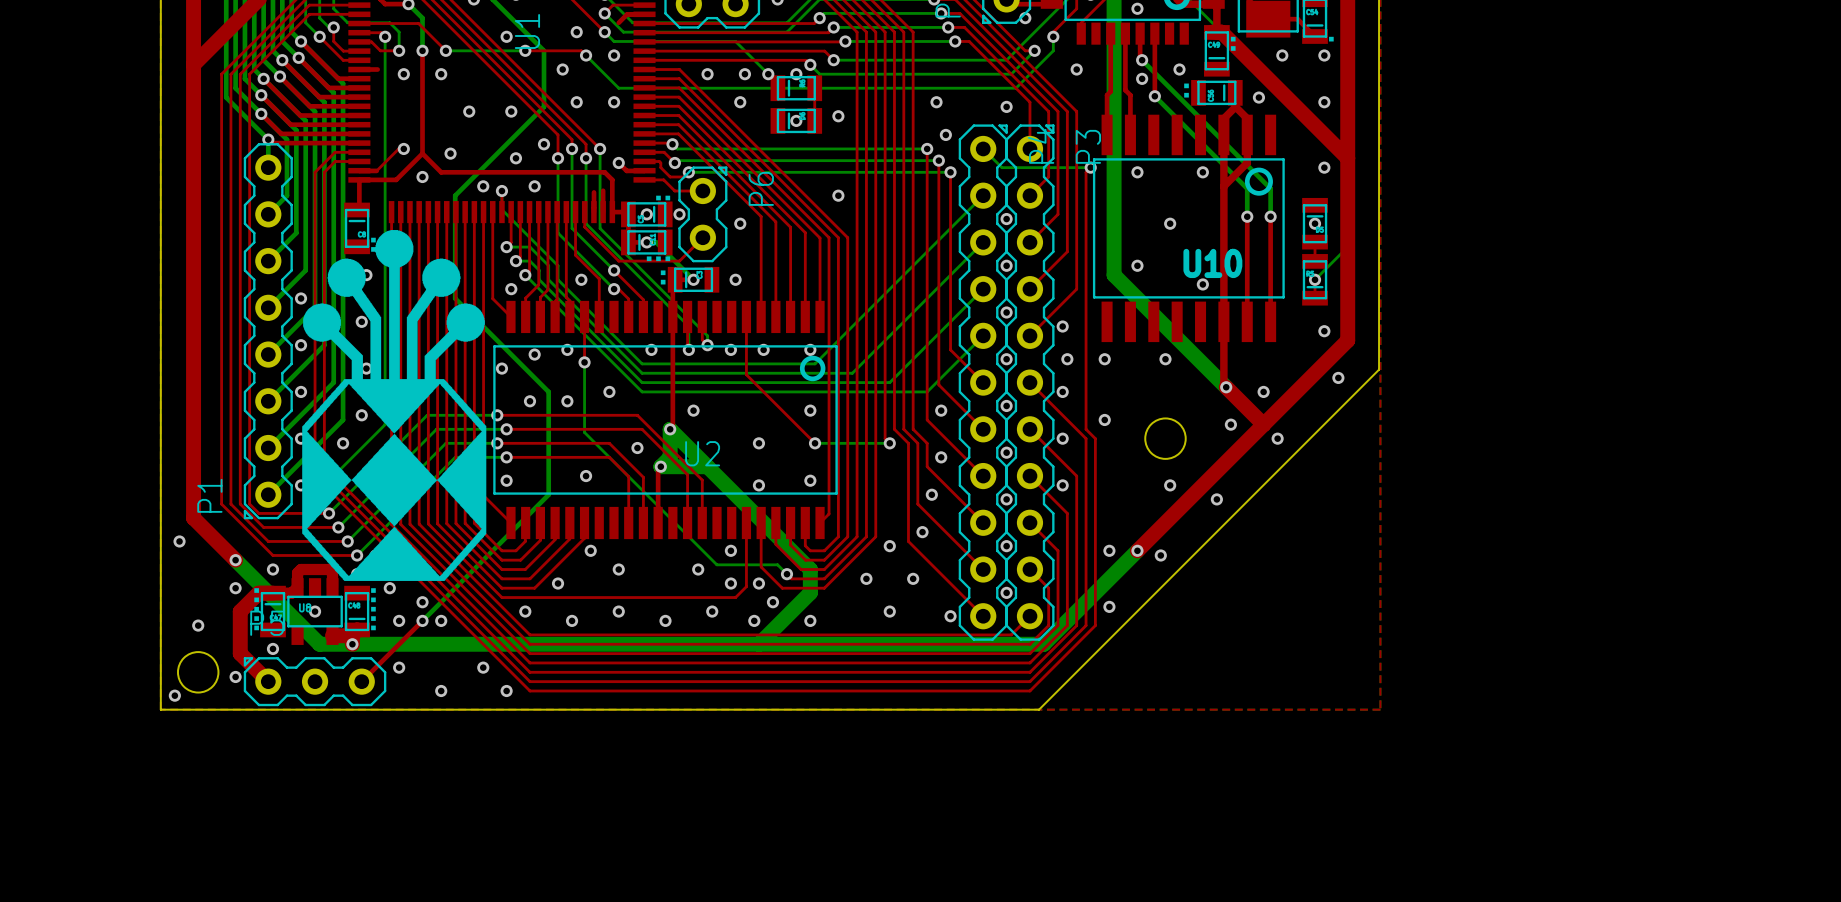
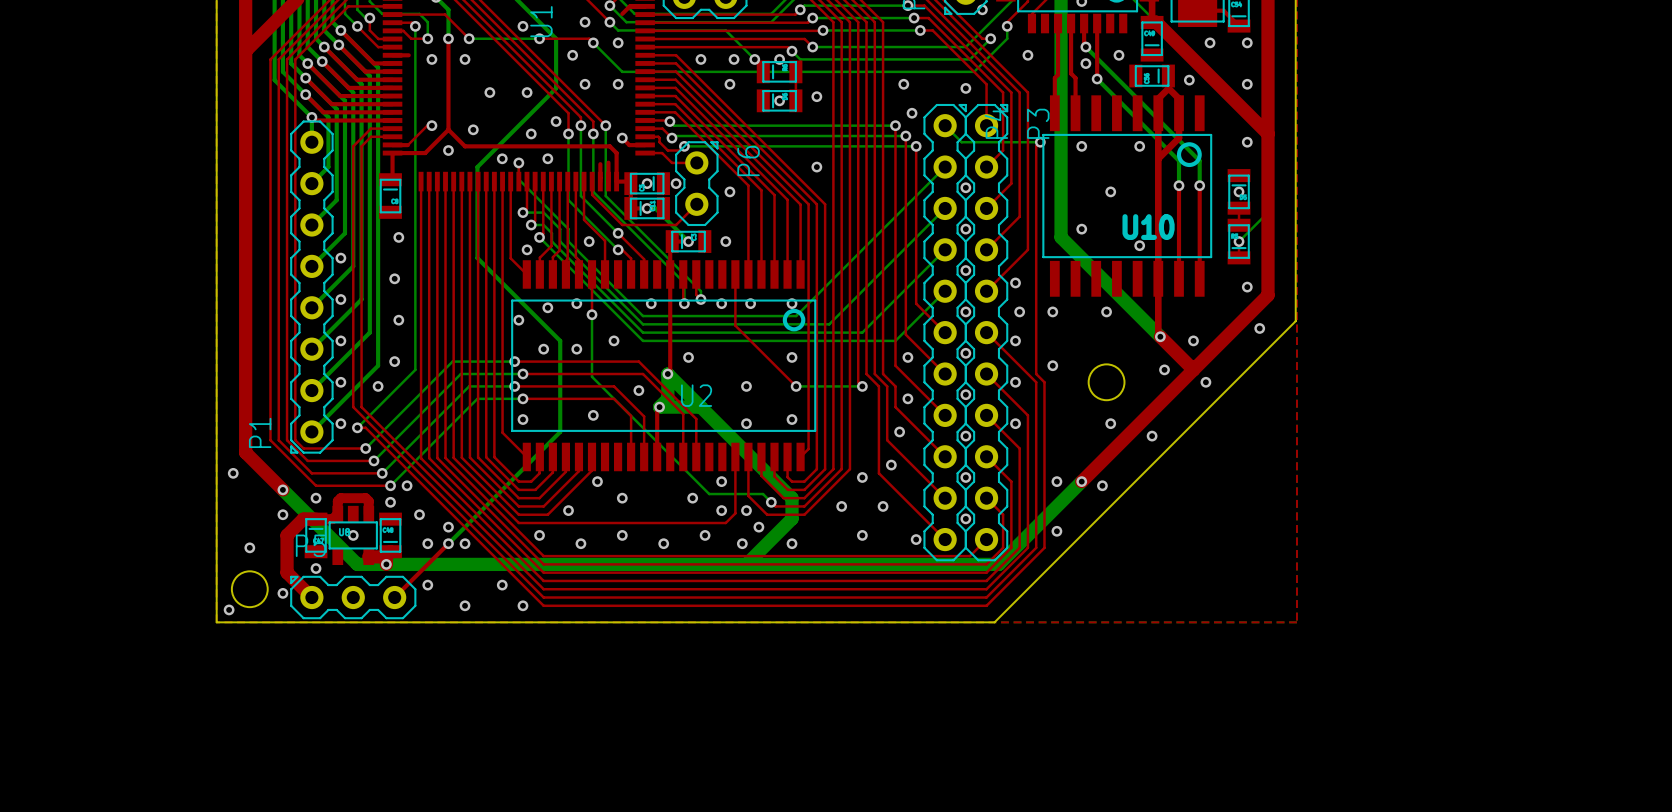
drawing: [1230, 36, 1236, 51] -> none
drawing: [1329, 36, 1334, 42] -> none
drawing: [1184, 83, 1189, 98] -> none
drawing: [656, 195, 671, 201] -> none
drawing: [302, 230, 487, 631] -> none
drawing: [646, 256, 671, 285] -> none
drawing: [254, 588, 259, 631] -> none

